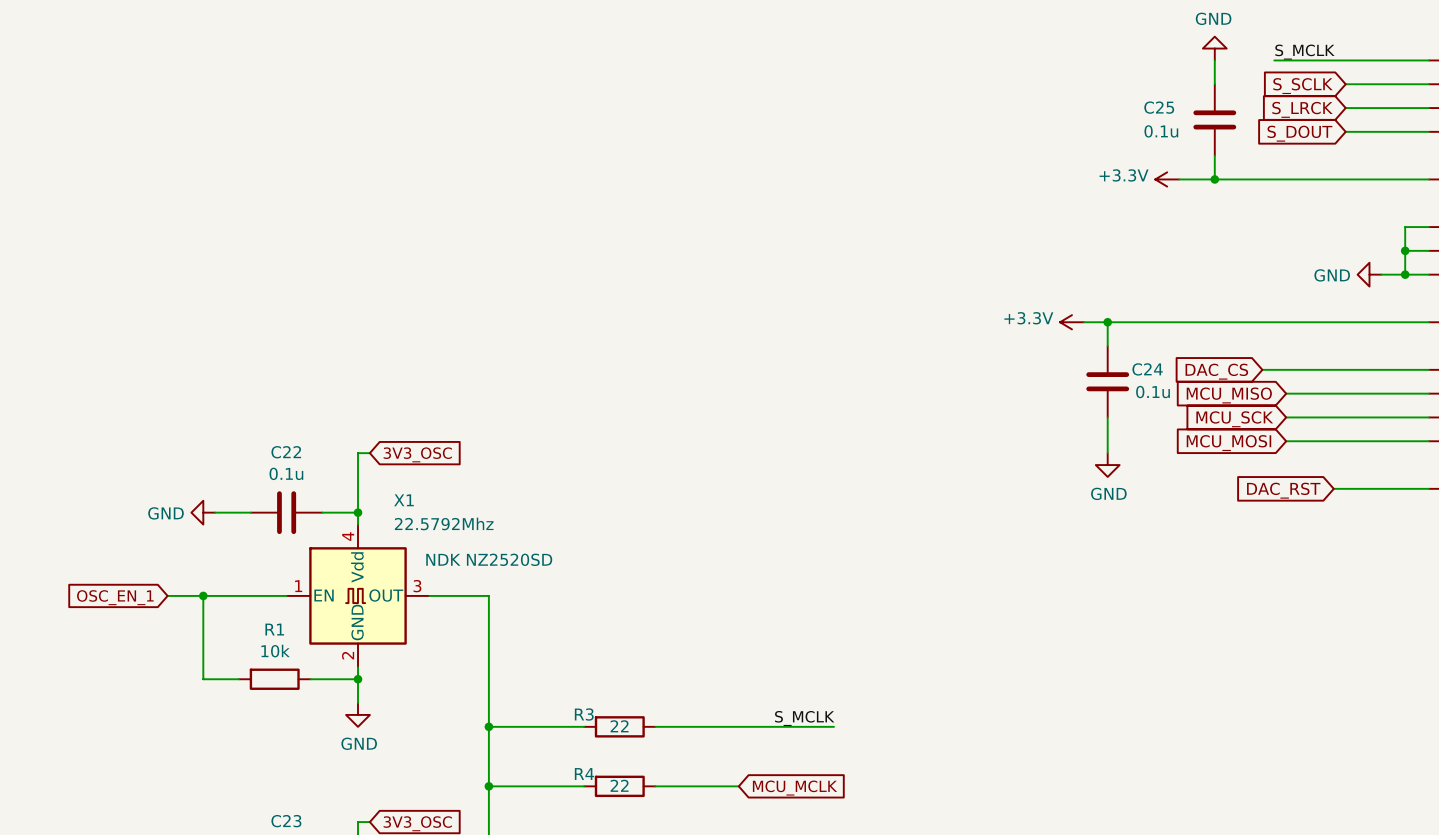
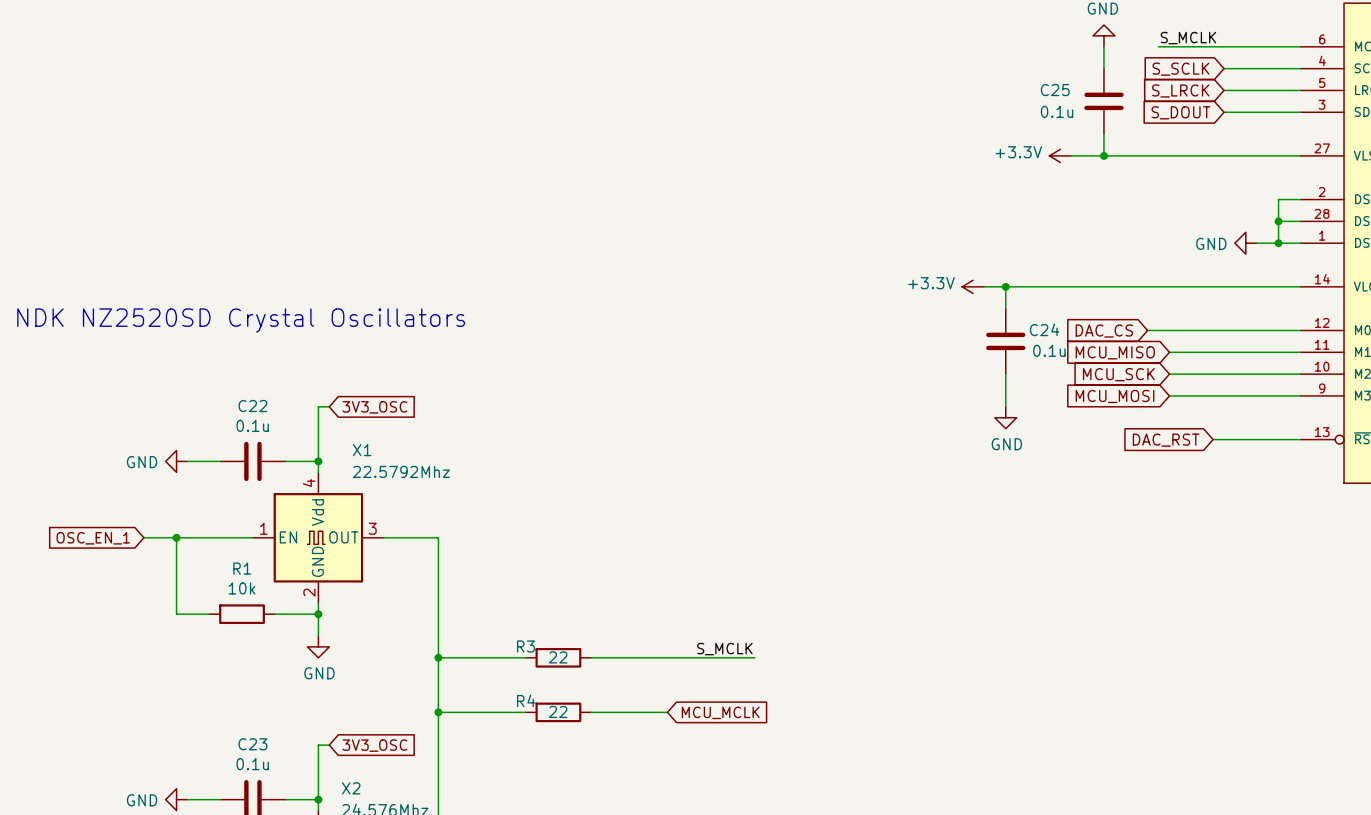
text: none -> NDK NZ2520SD Crystal Oscillators (241, 320)
X1 text: NDK NZ2520SD (489, 559) -> none

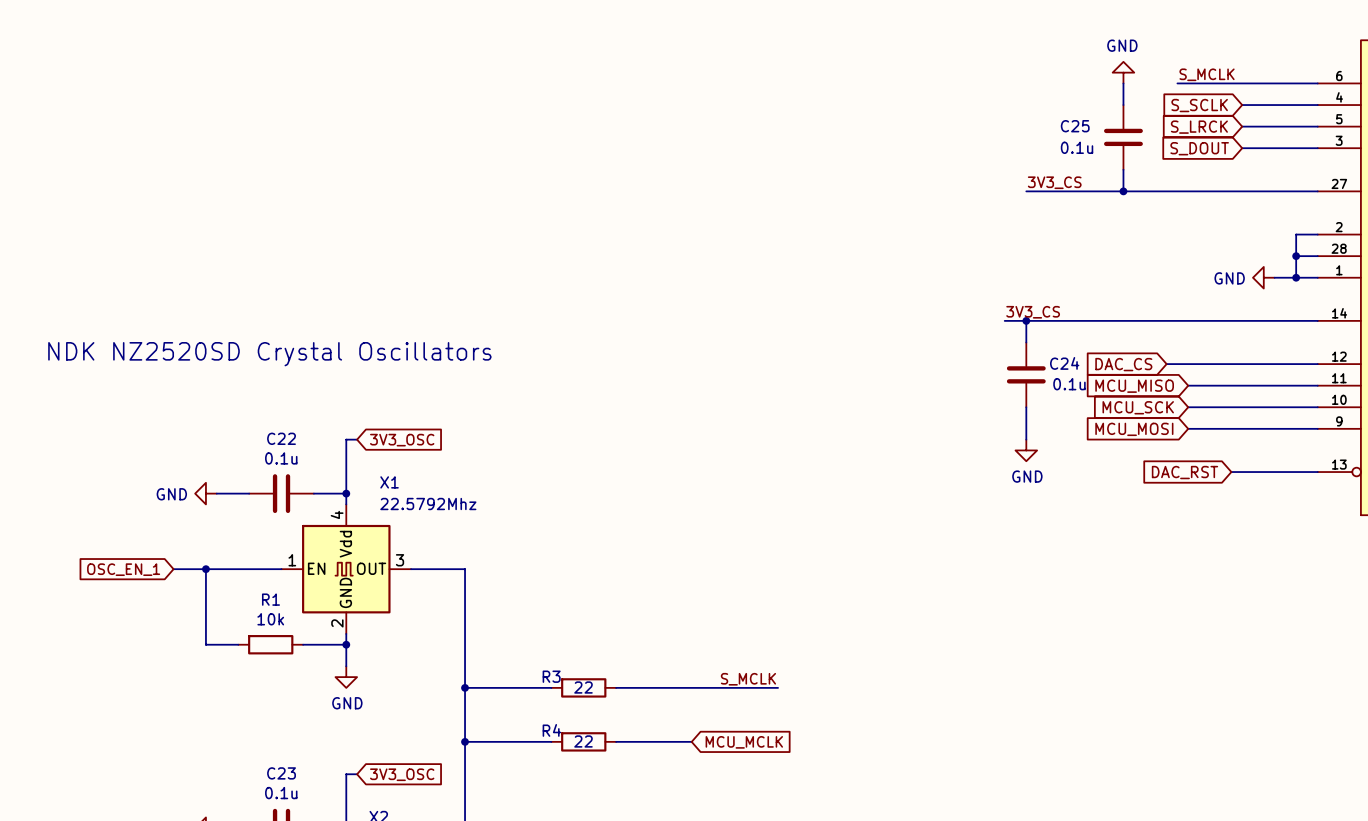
label: none -> 3V3_CS (1054, 182)
wire: none -> (1026, 191) (1091, 191)
power symbol: +3.3V (1060, 155) -> none
label: none -> 3V3_CS (1033, 312)
power symbol: +3.3V (973, 286) -> none

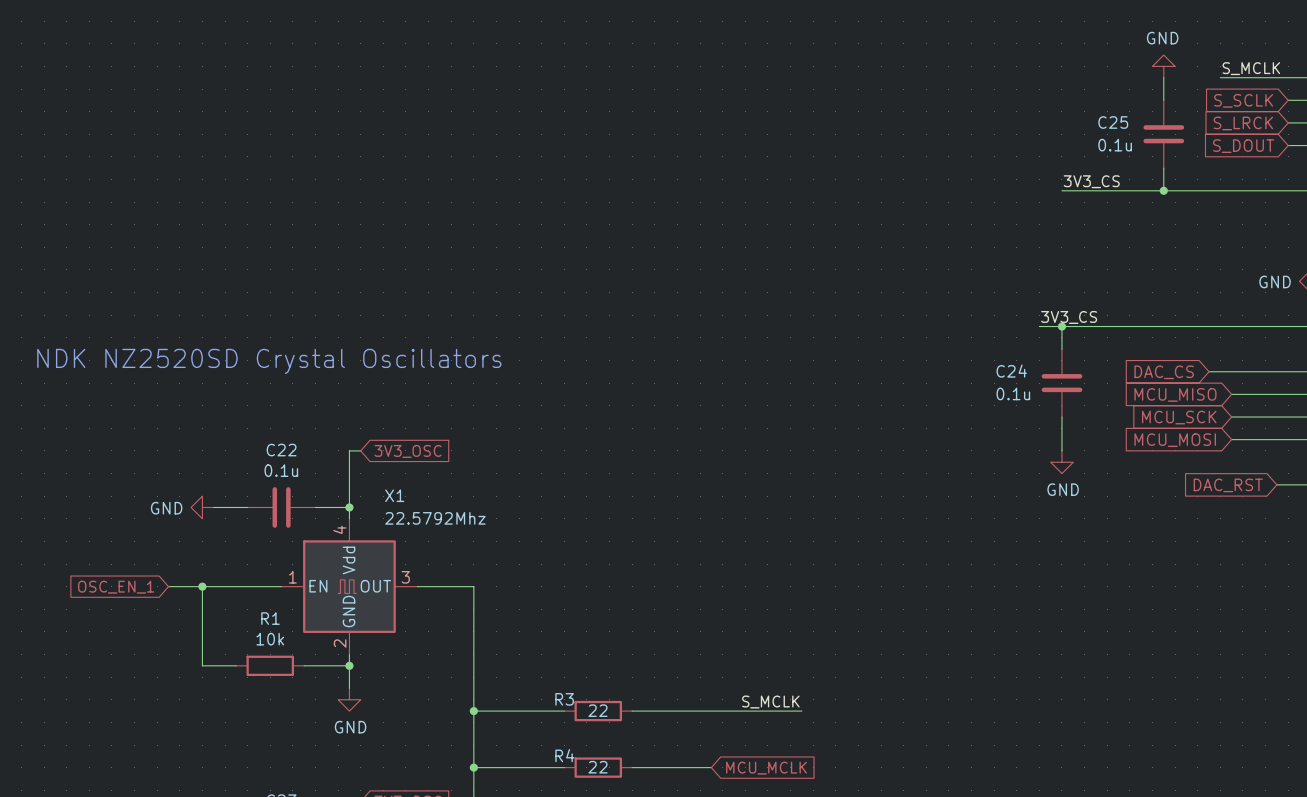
C24 name position: C24 (1064, 363) -> C24 (1011, 371)
C24 value position: 0.1u (1069, 384) -> 0.1u (1013, 393)

